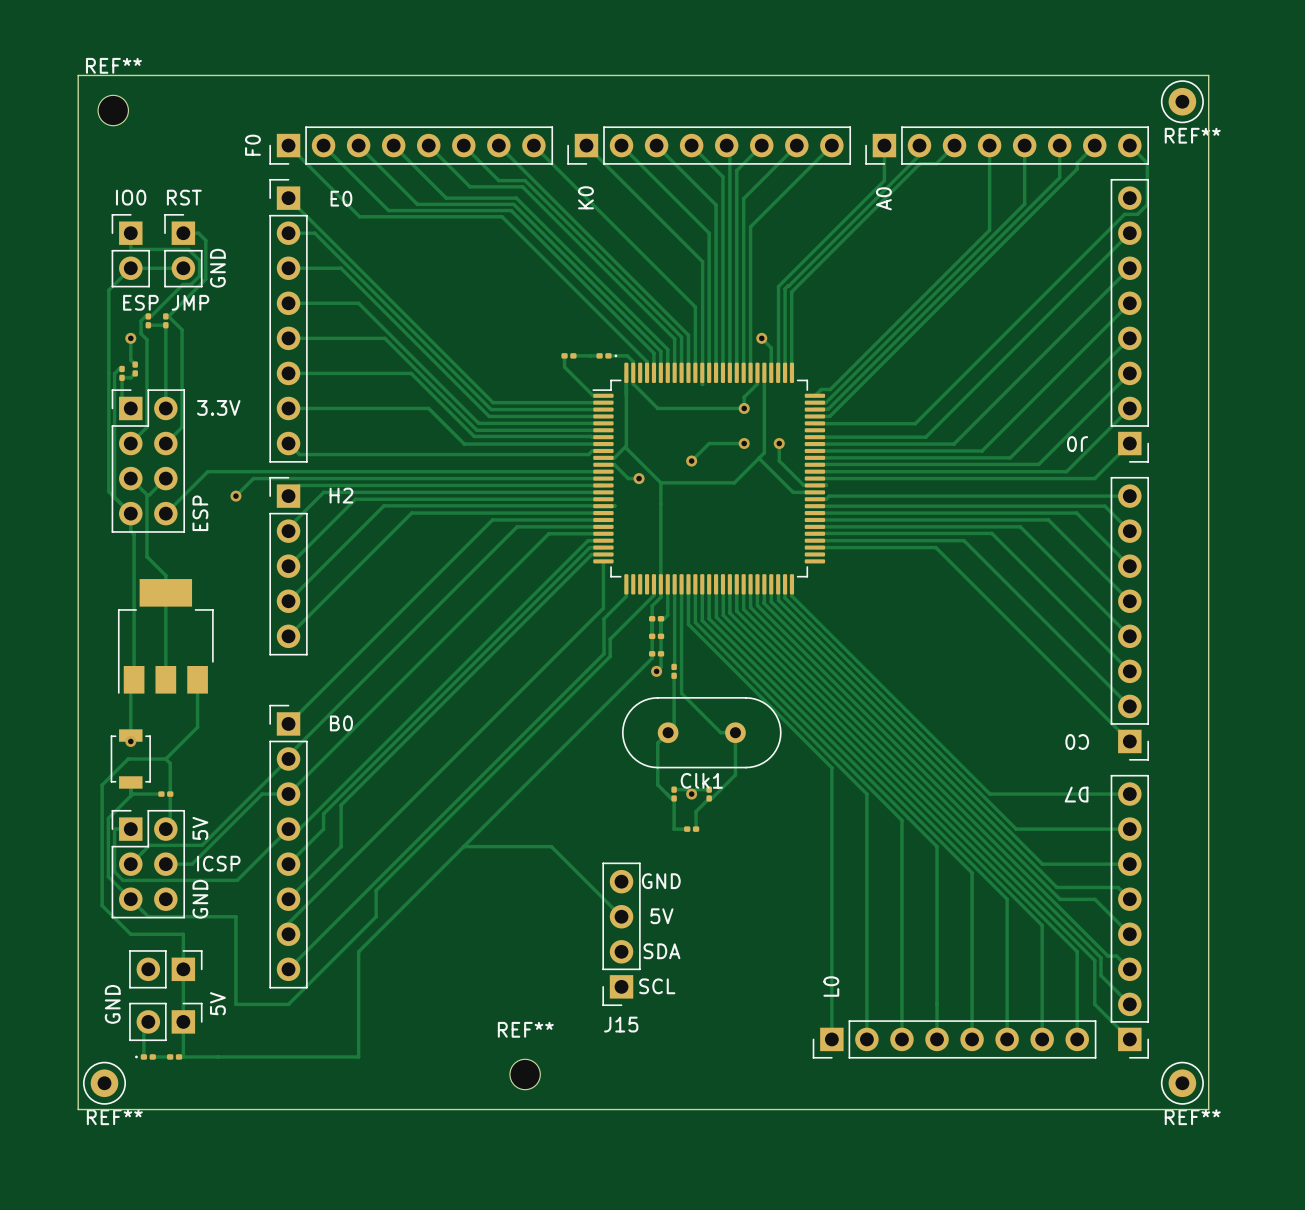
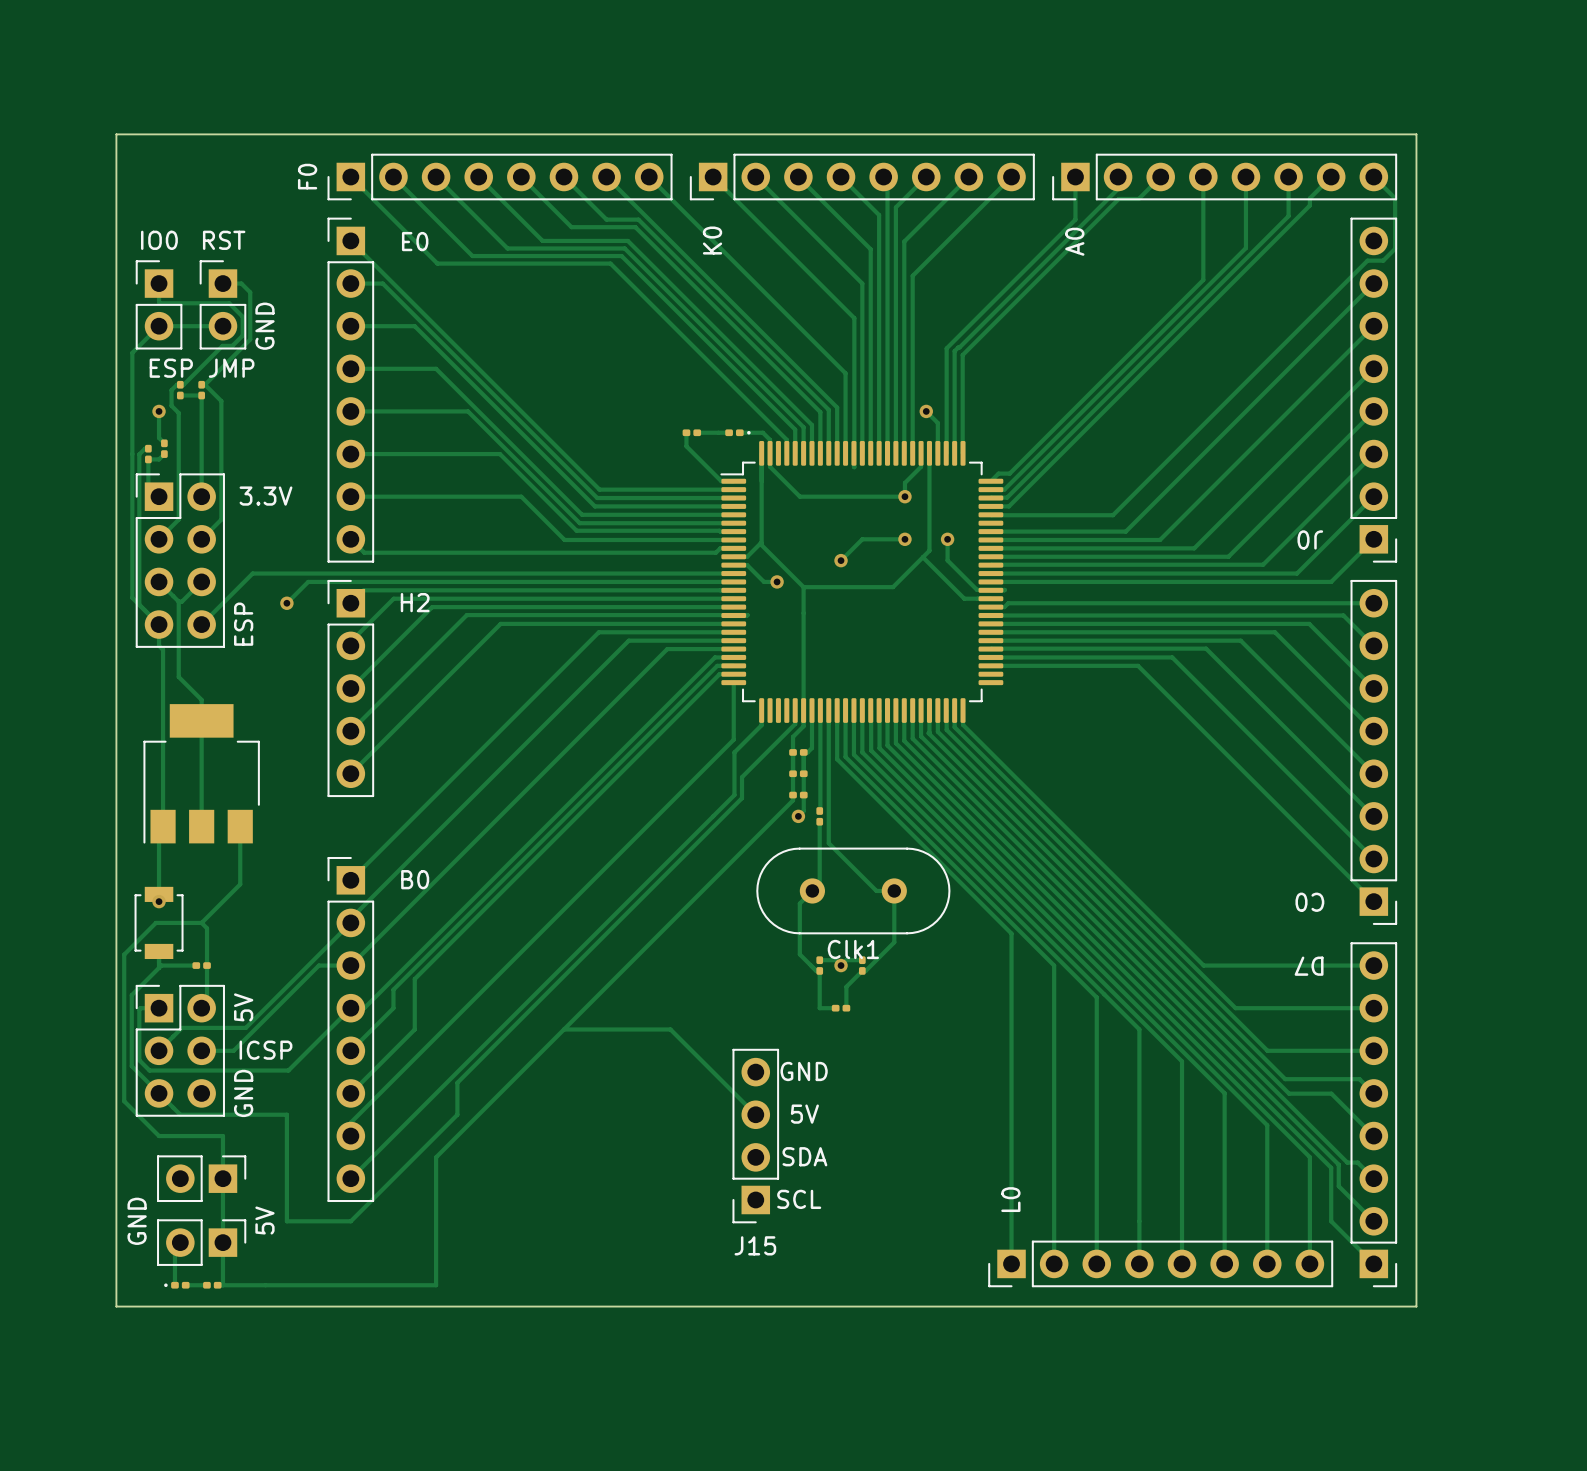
board edge: (78, 75) (1208, 75) (1208, 1109) (78, 1109) (78, 75) -> (116, 134) (116, 1306) (1416, 1306) (1416, 134) (116, 134)
REF**: (1182, 101) -> none
REF**: (113, 110) -> none
REF**: (525, 1074) -> none
REF**: (104, 1083) -> none
REF**: (1182, 1083) -> none

